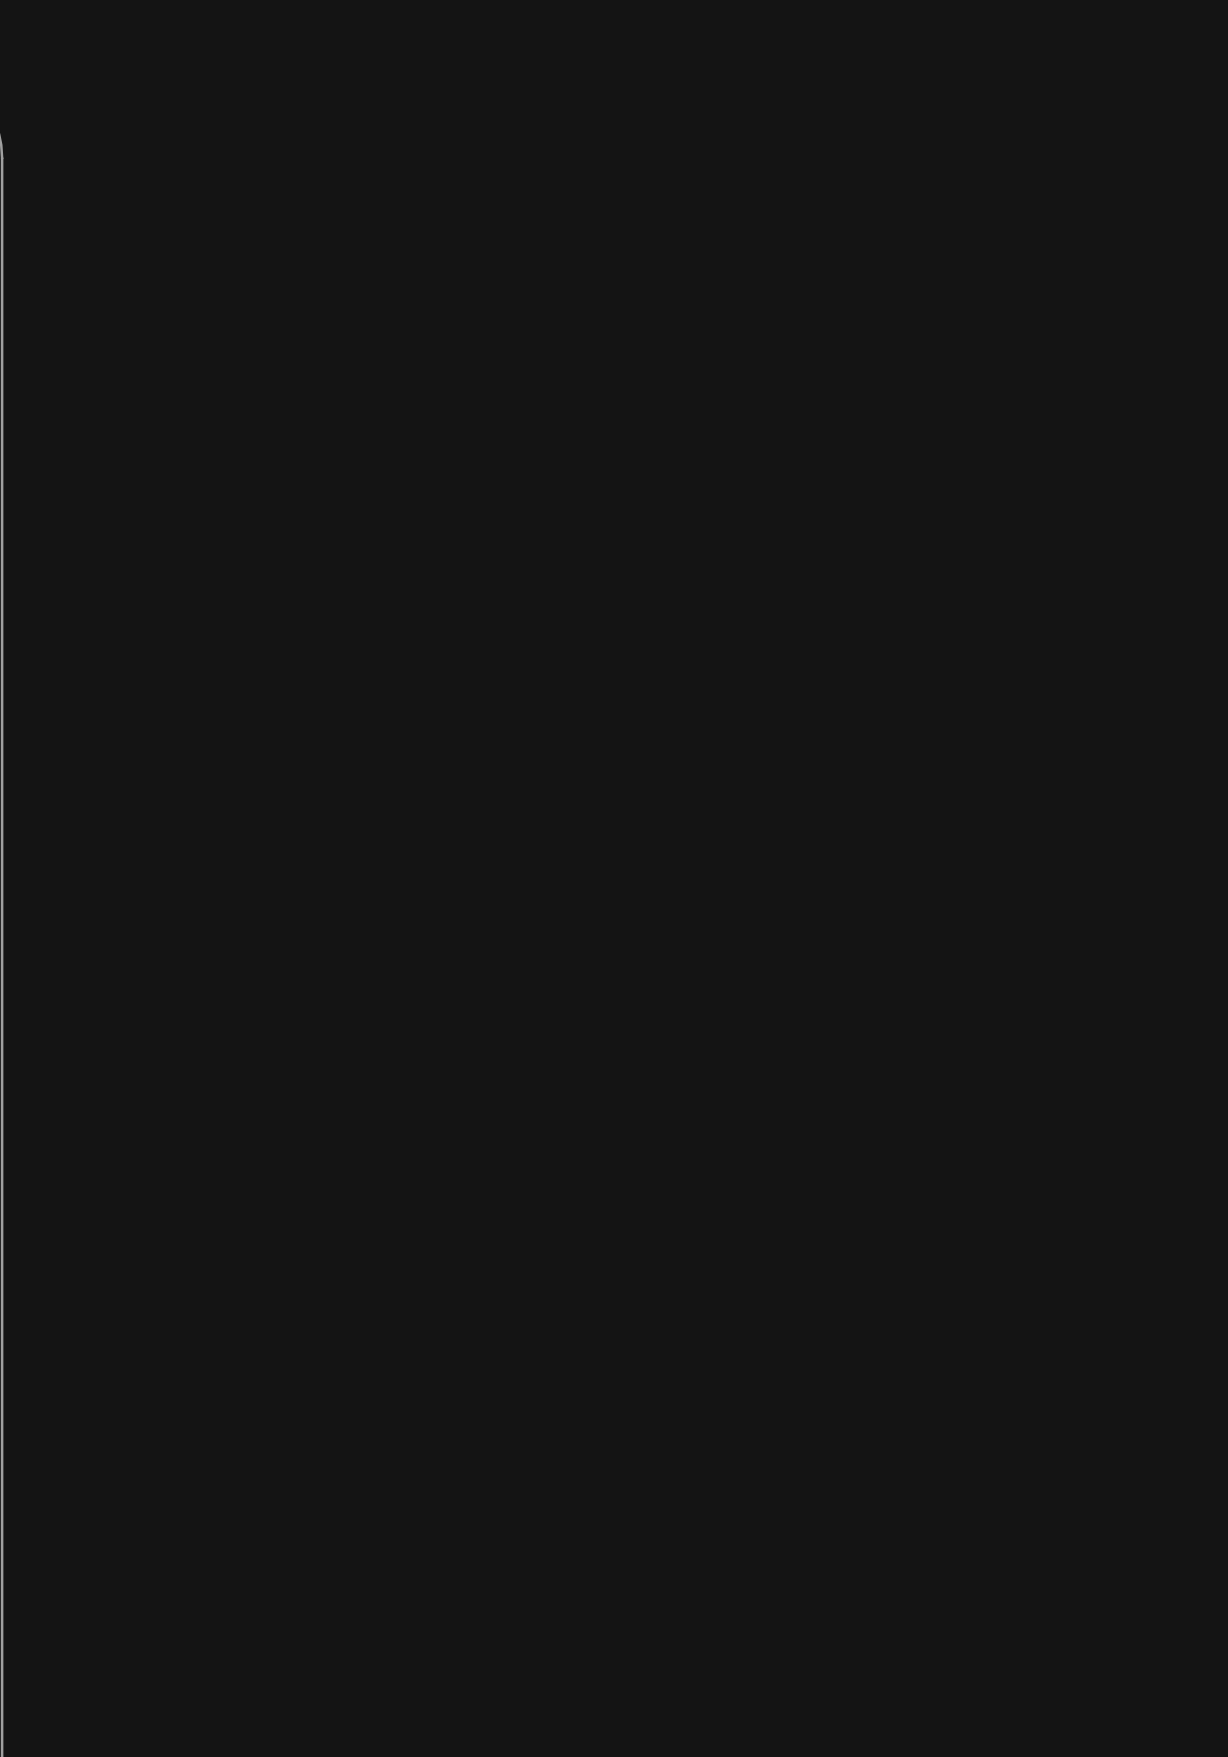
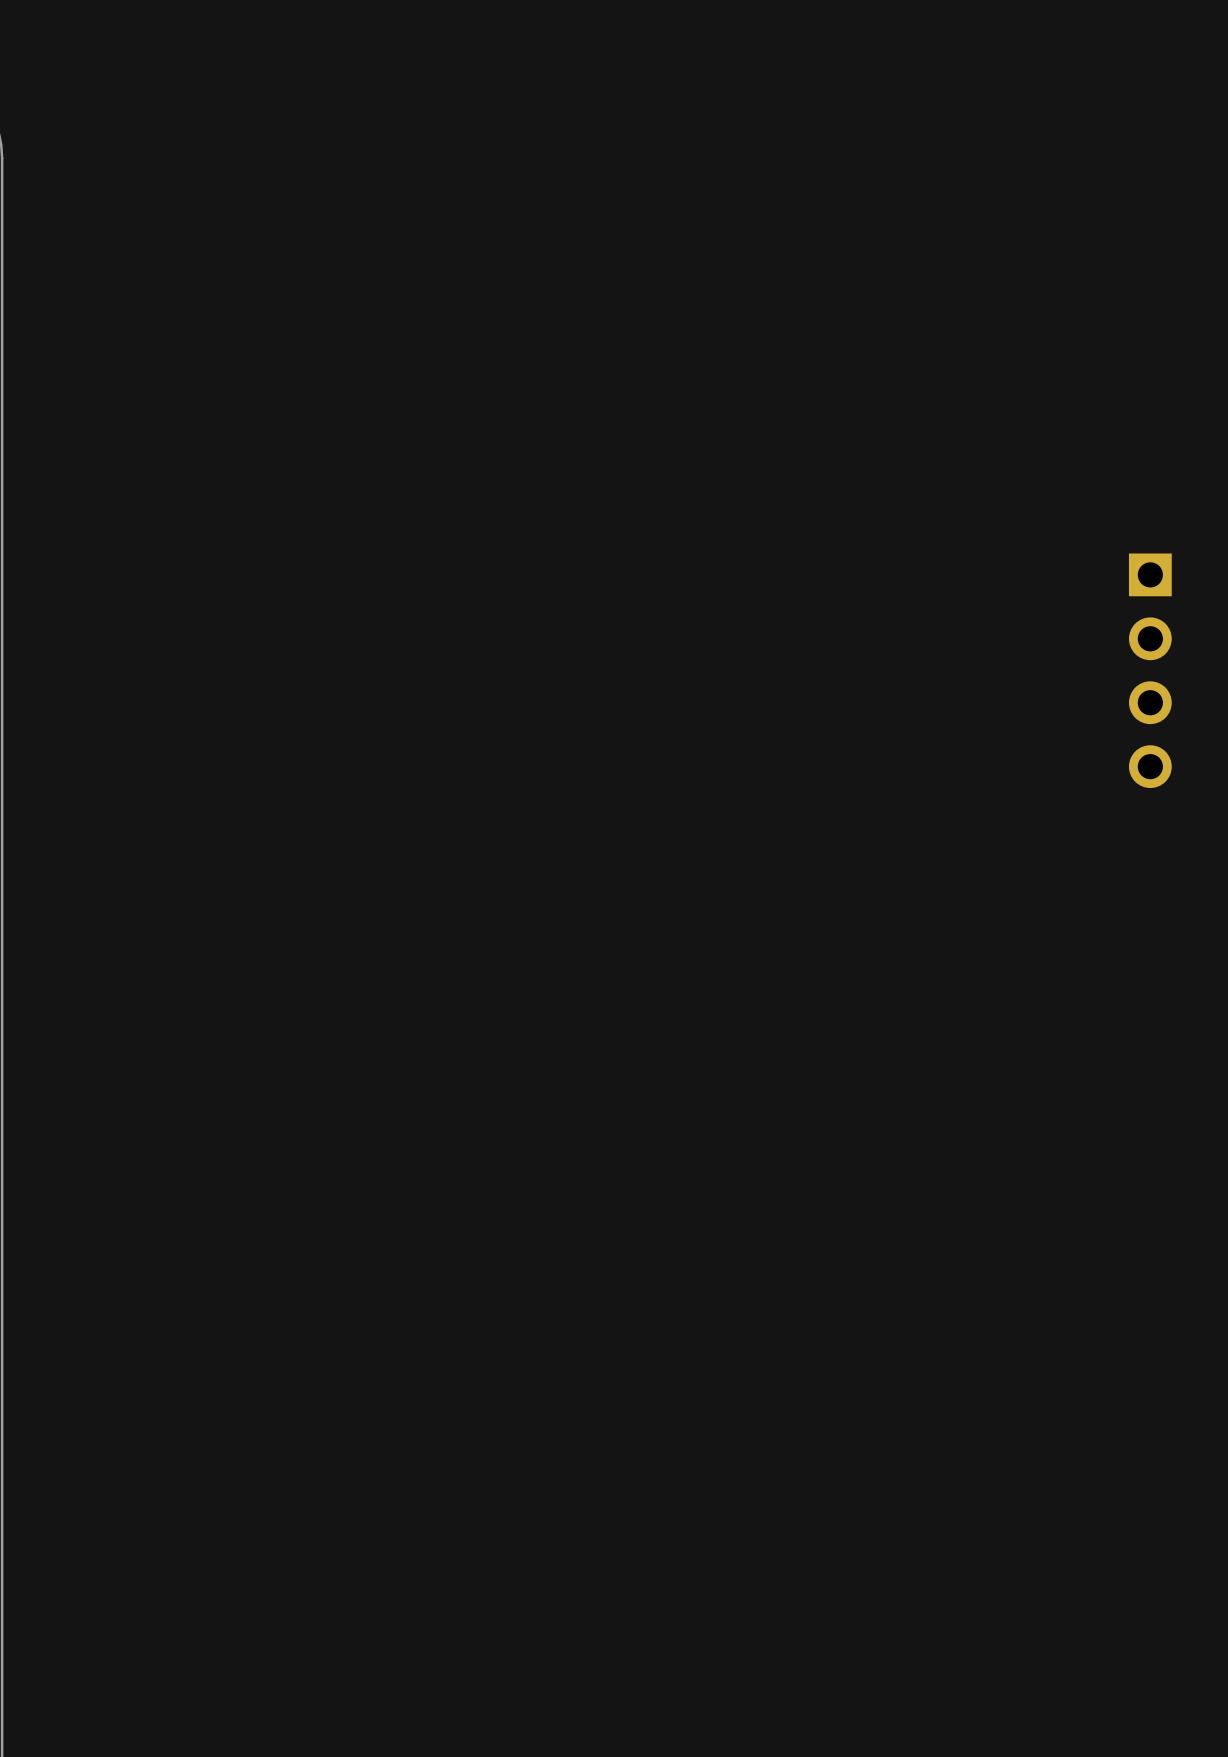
part: none -> (1150, 670)

